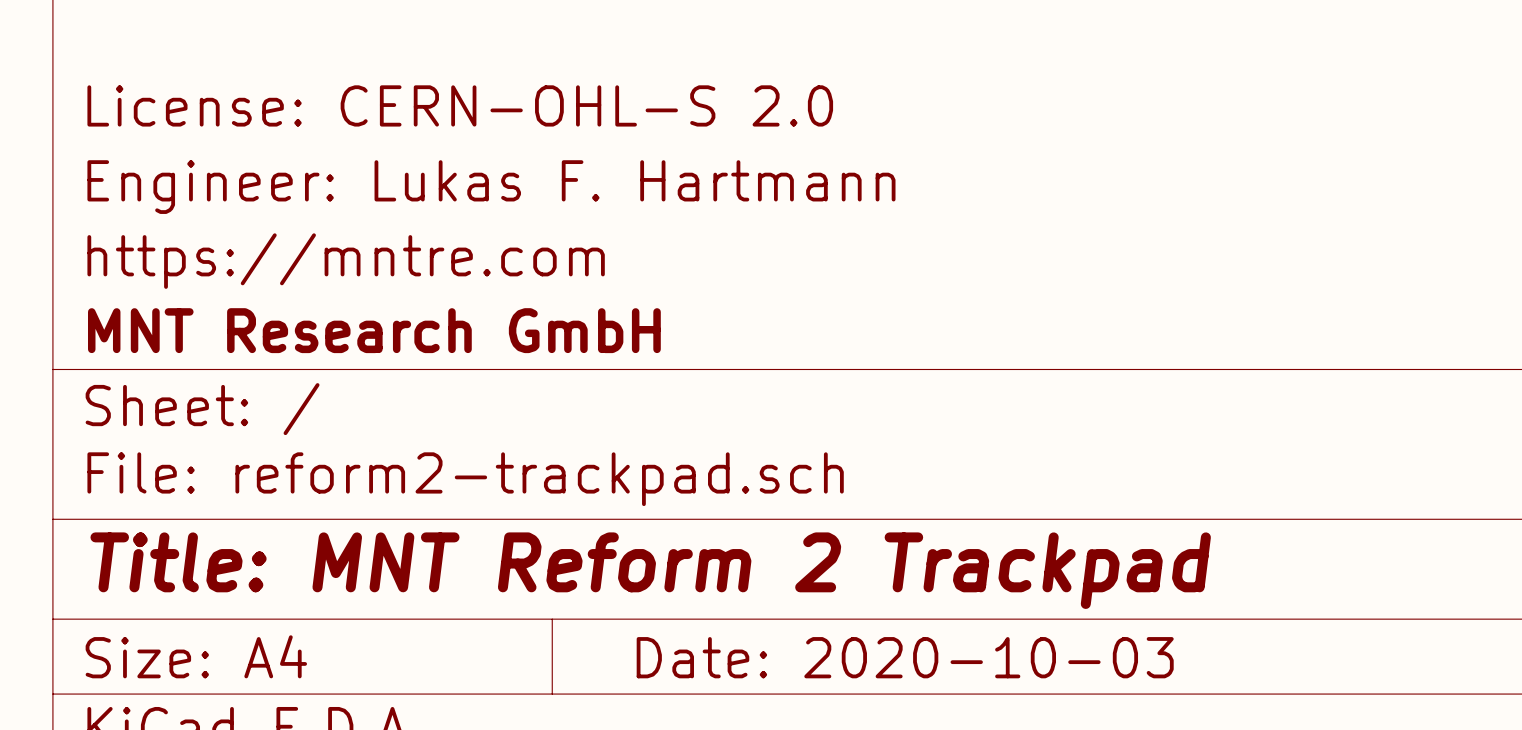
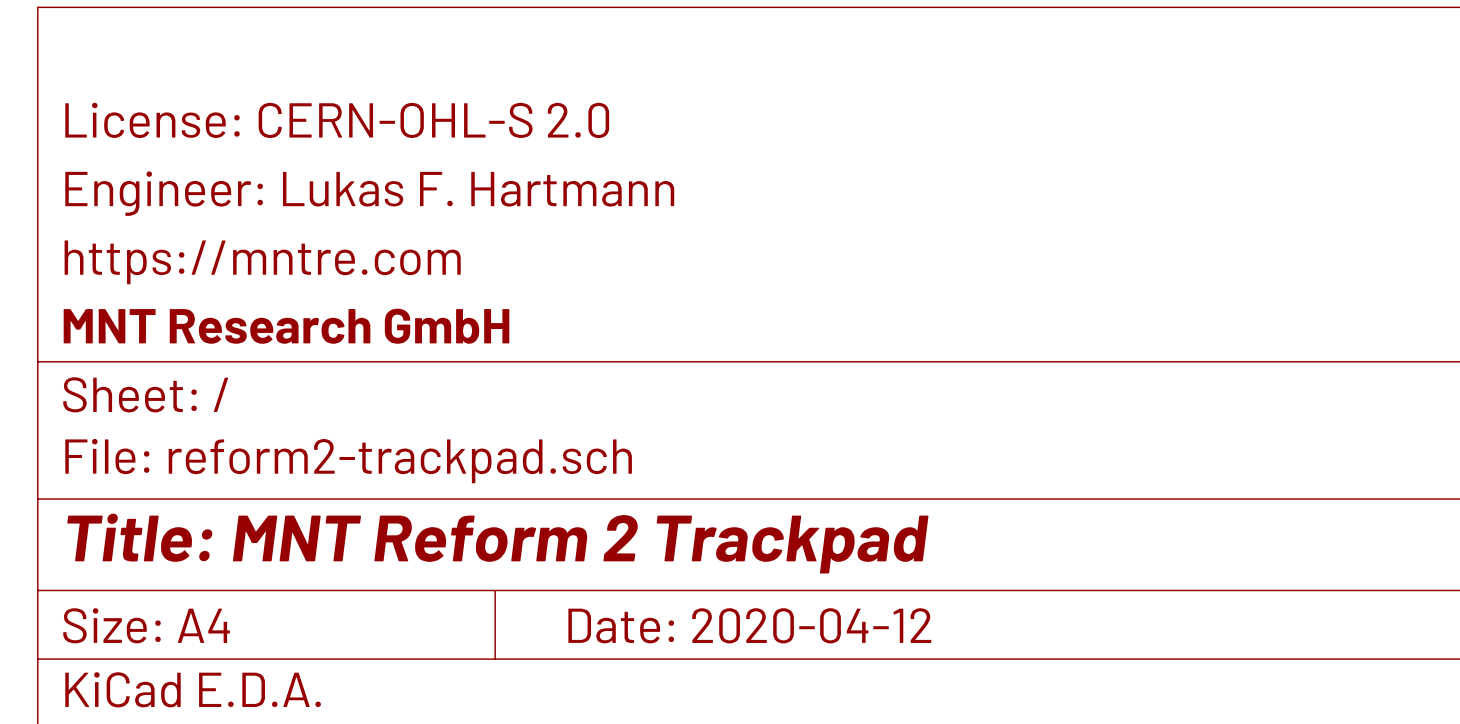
title block: Date: 2020-10-03 (905, 657) -> Date: 2020-04-12 (749, 625)

